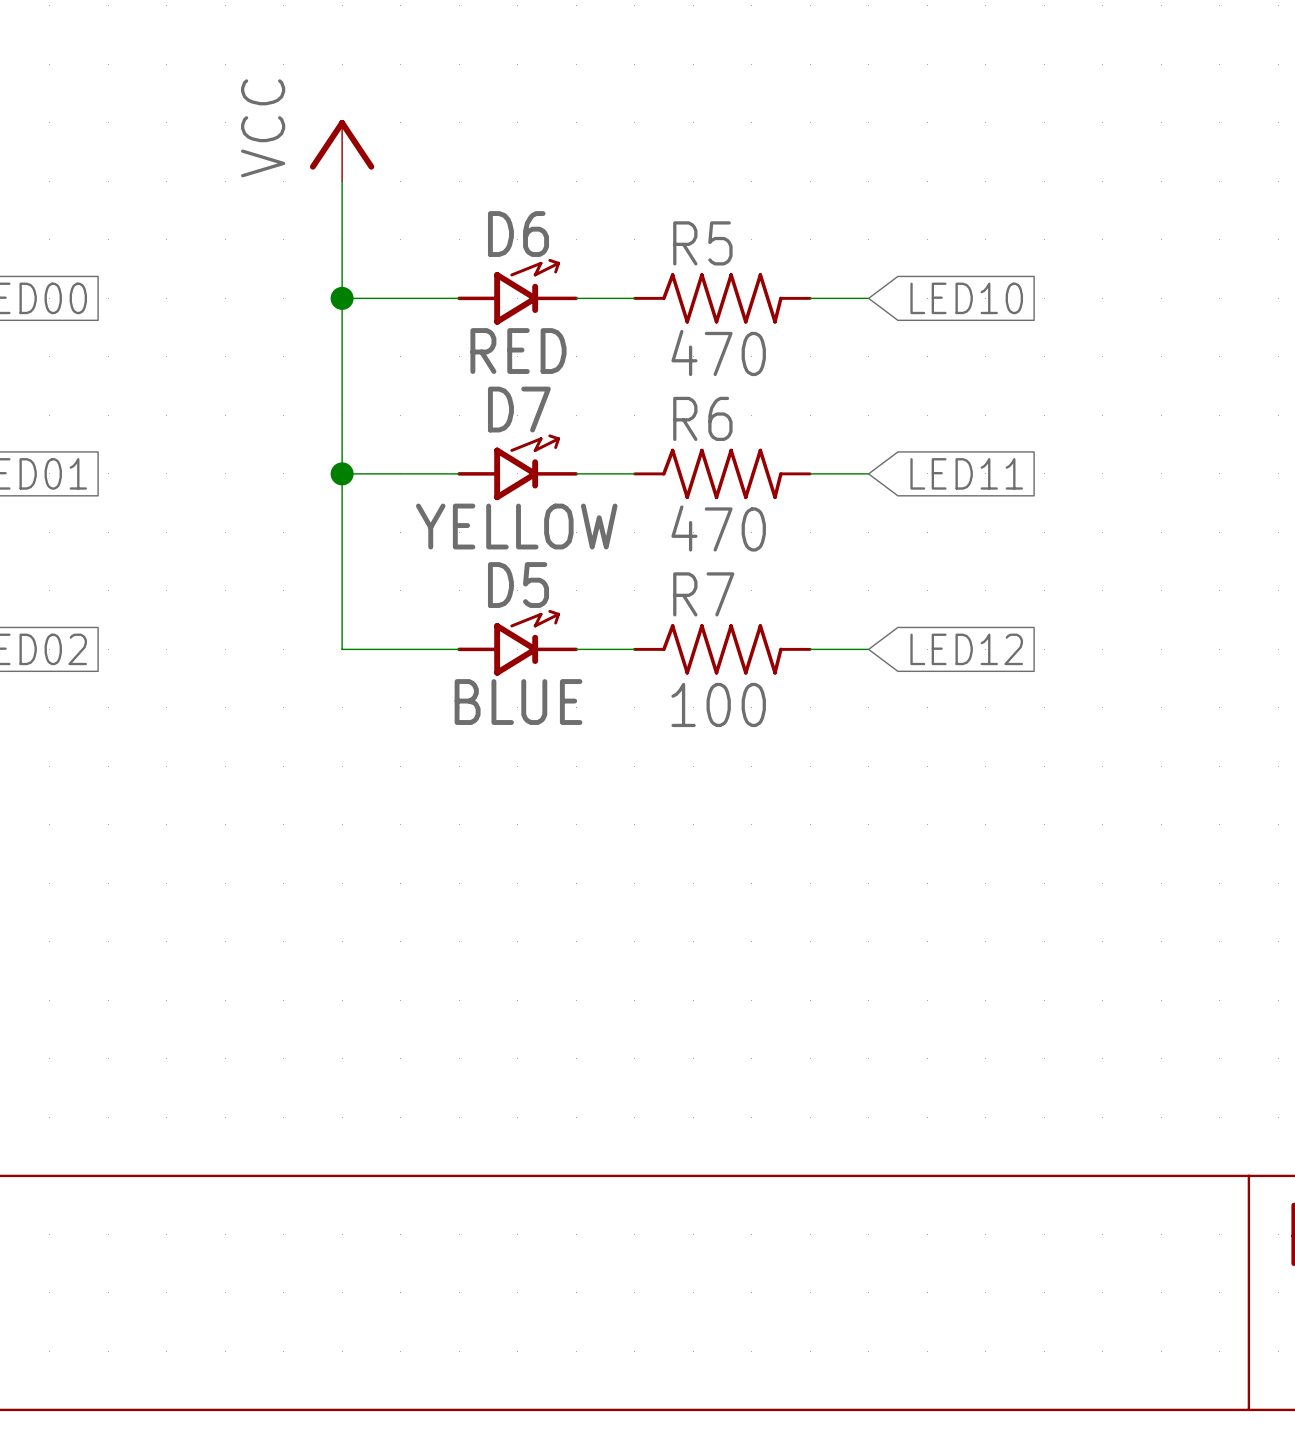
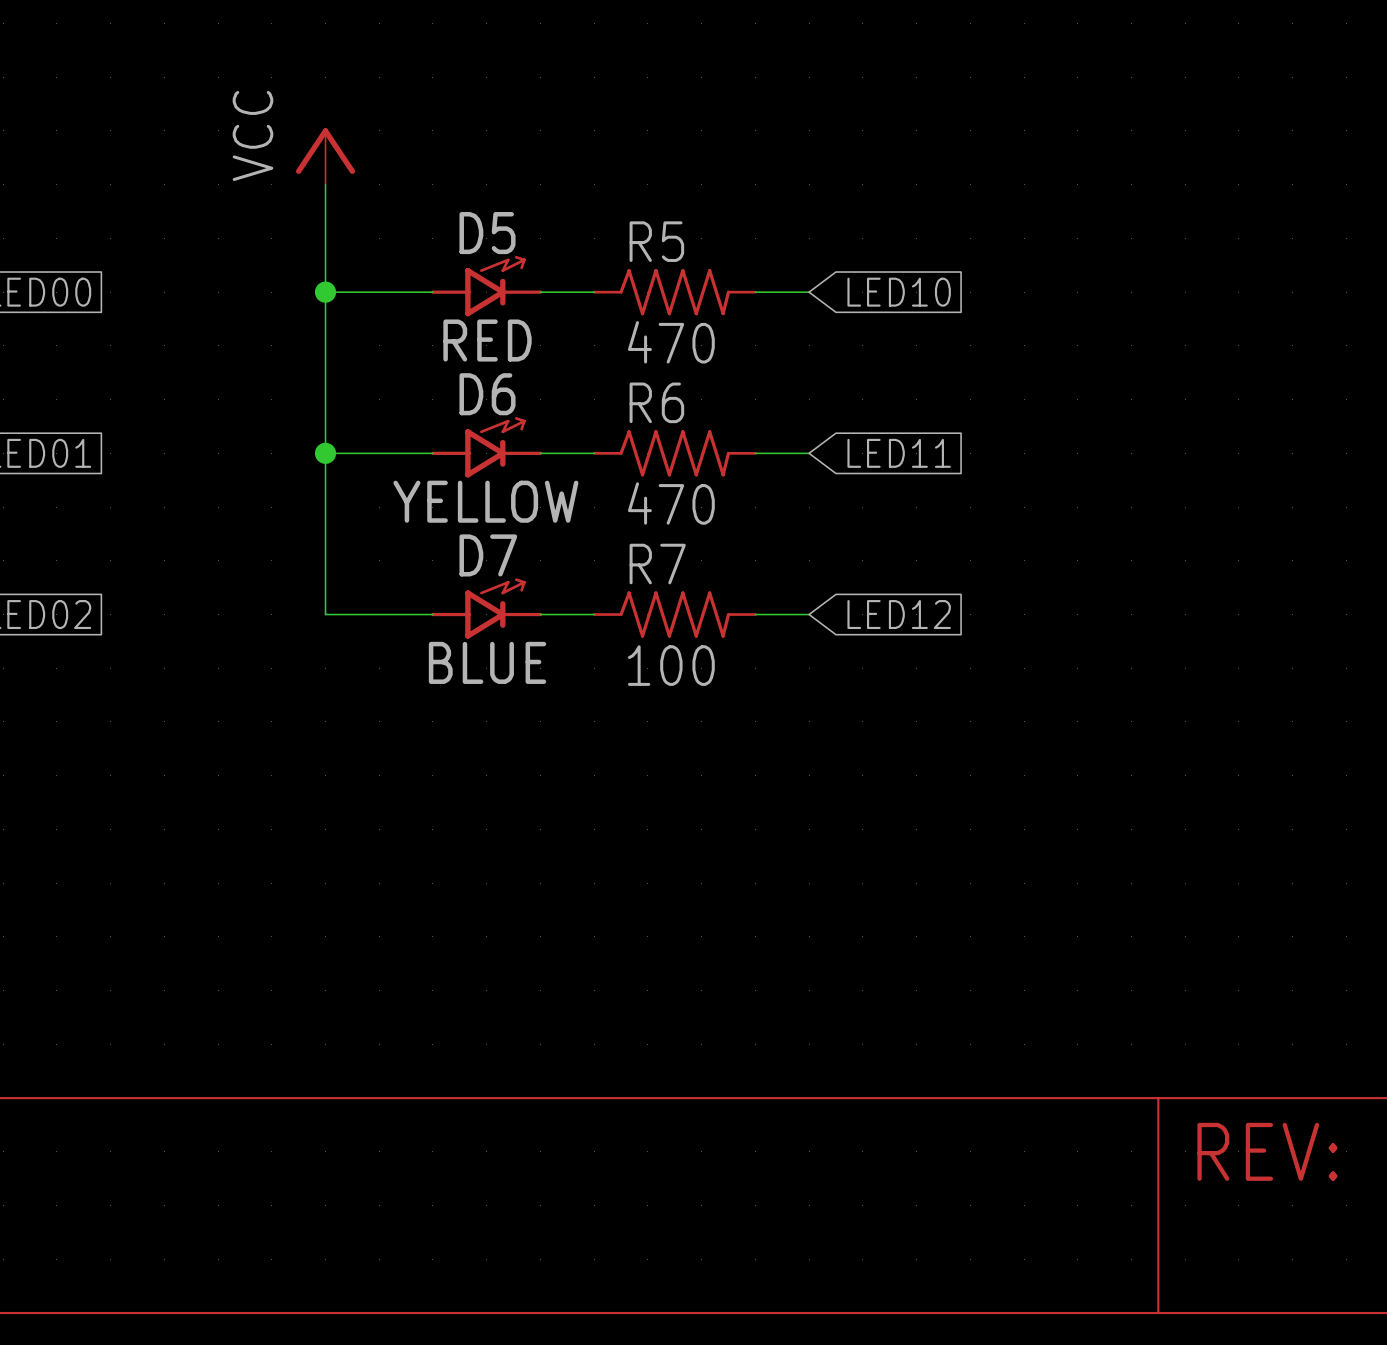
D6 name: D6 (518, 234) -> D5 (487, 233)
D7 name: D7 (519, 409) -> D6 (487, 394)
D5 name: D5 (518, 585) -> D7 (488, 555)

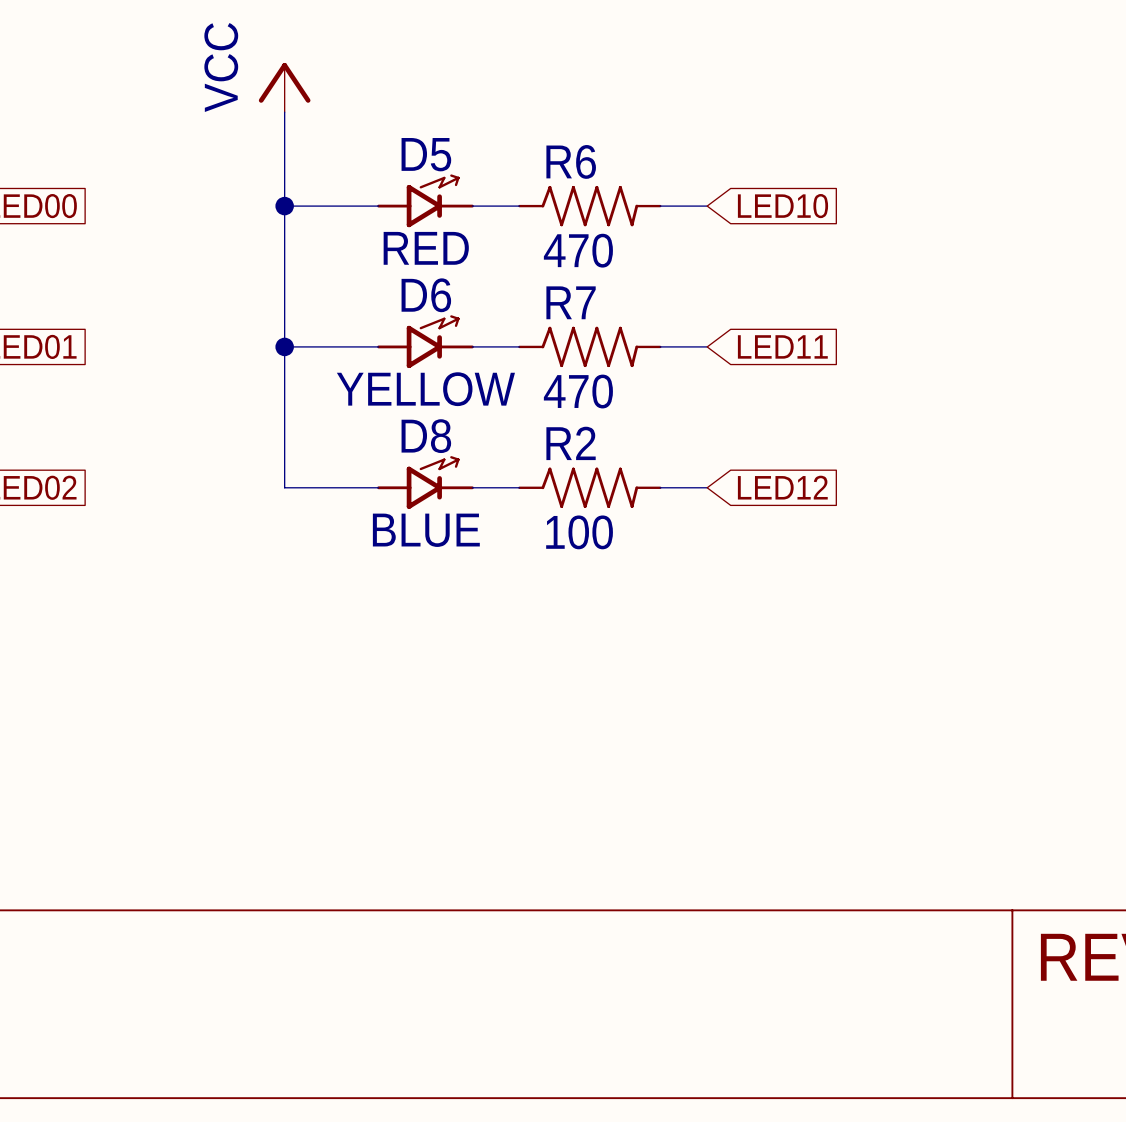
R5 name: R5 (656, 241) -> R6 (571, 161)
R6 name: R6 (656, 402) -> R7 (571, 302)
D7 name: D7 (488, 555) -> D8 (426, 436)
R7 name: R7 (657, 564) -> R2 (571, 443)

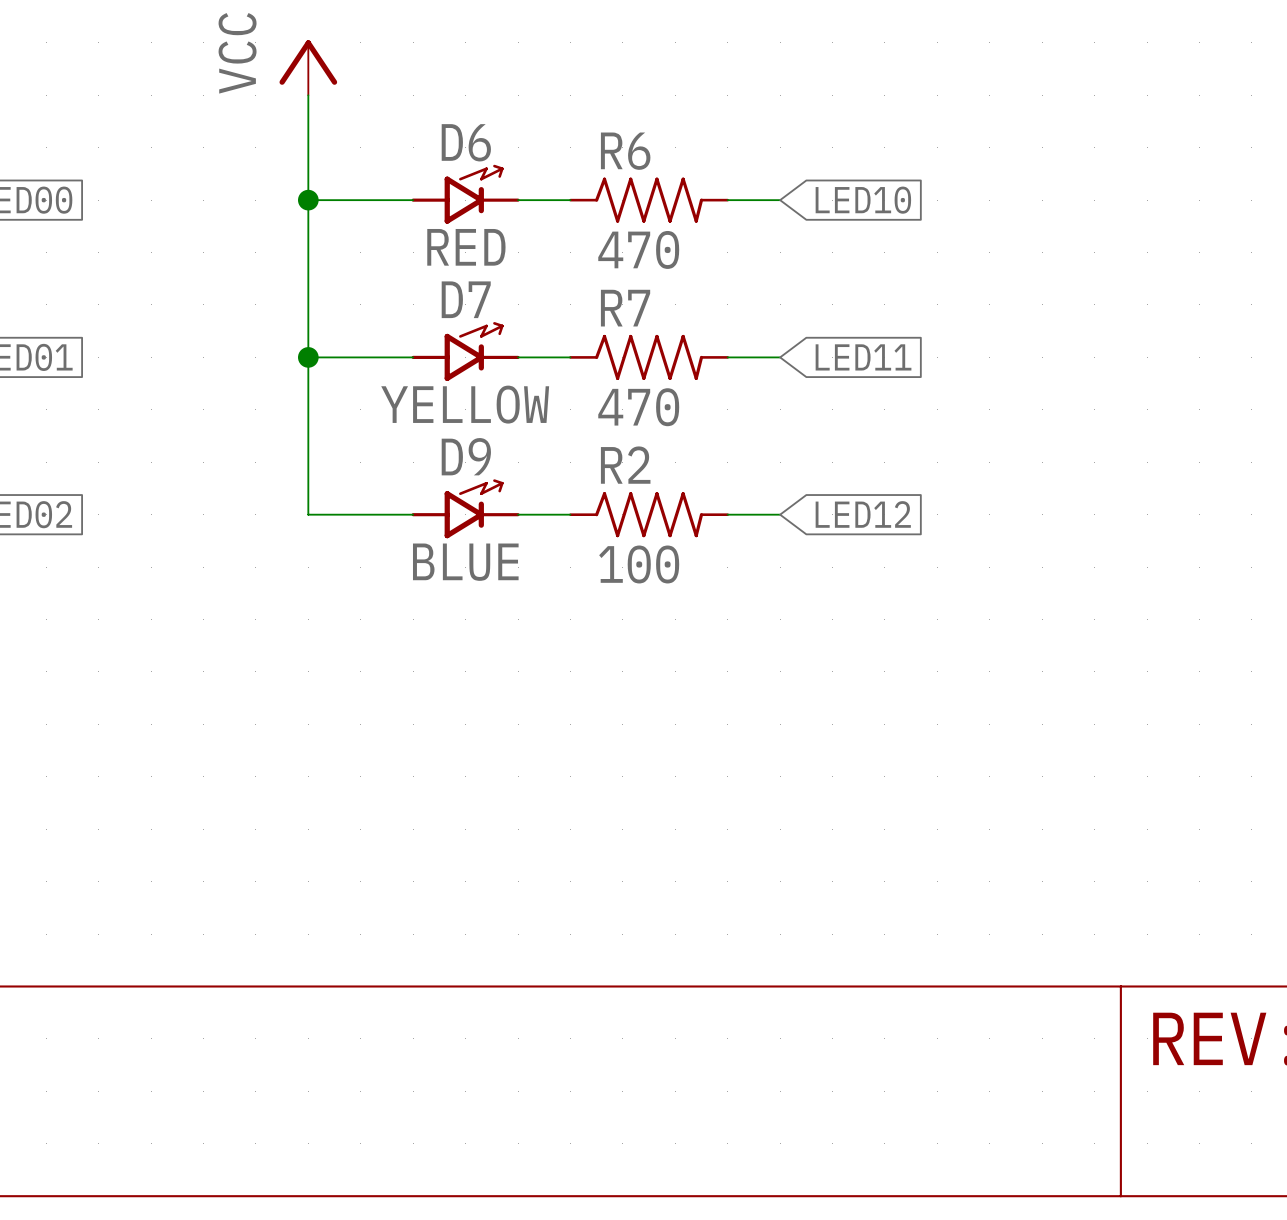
D5 name: D5 (426, 154) -> D6 (466, 142)
D6 name: D6 (426, 295) -> D7 (466, 299)
D8 name: D8 (426, 436) -> D9 (466, 456)

